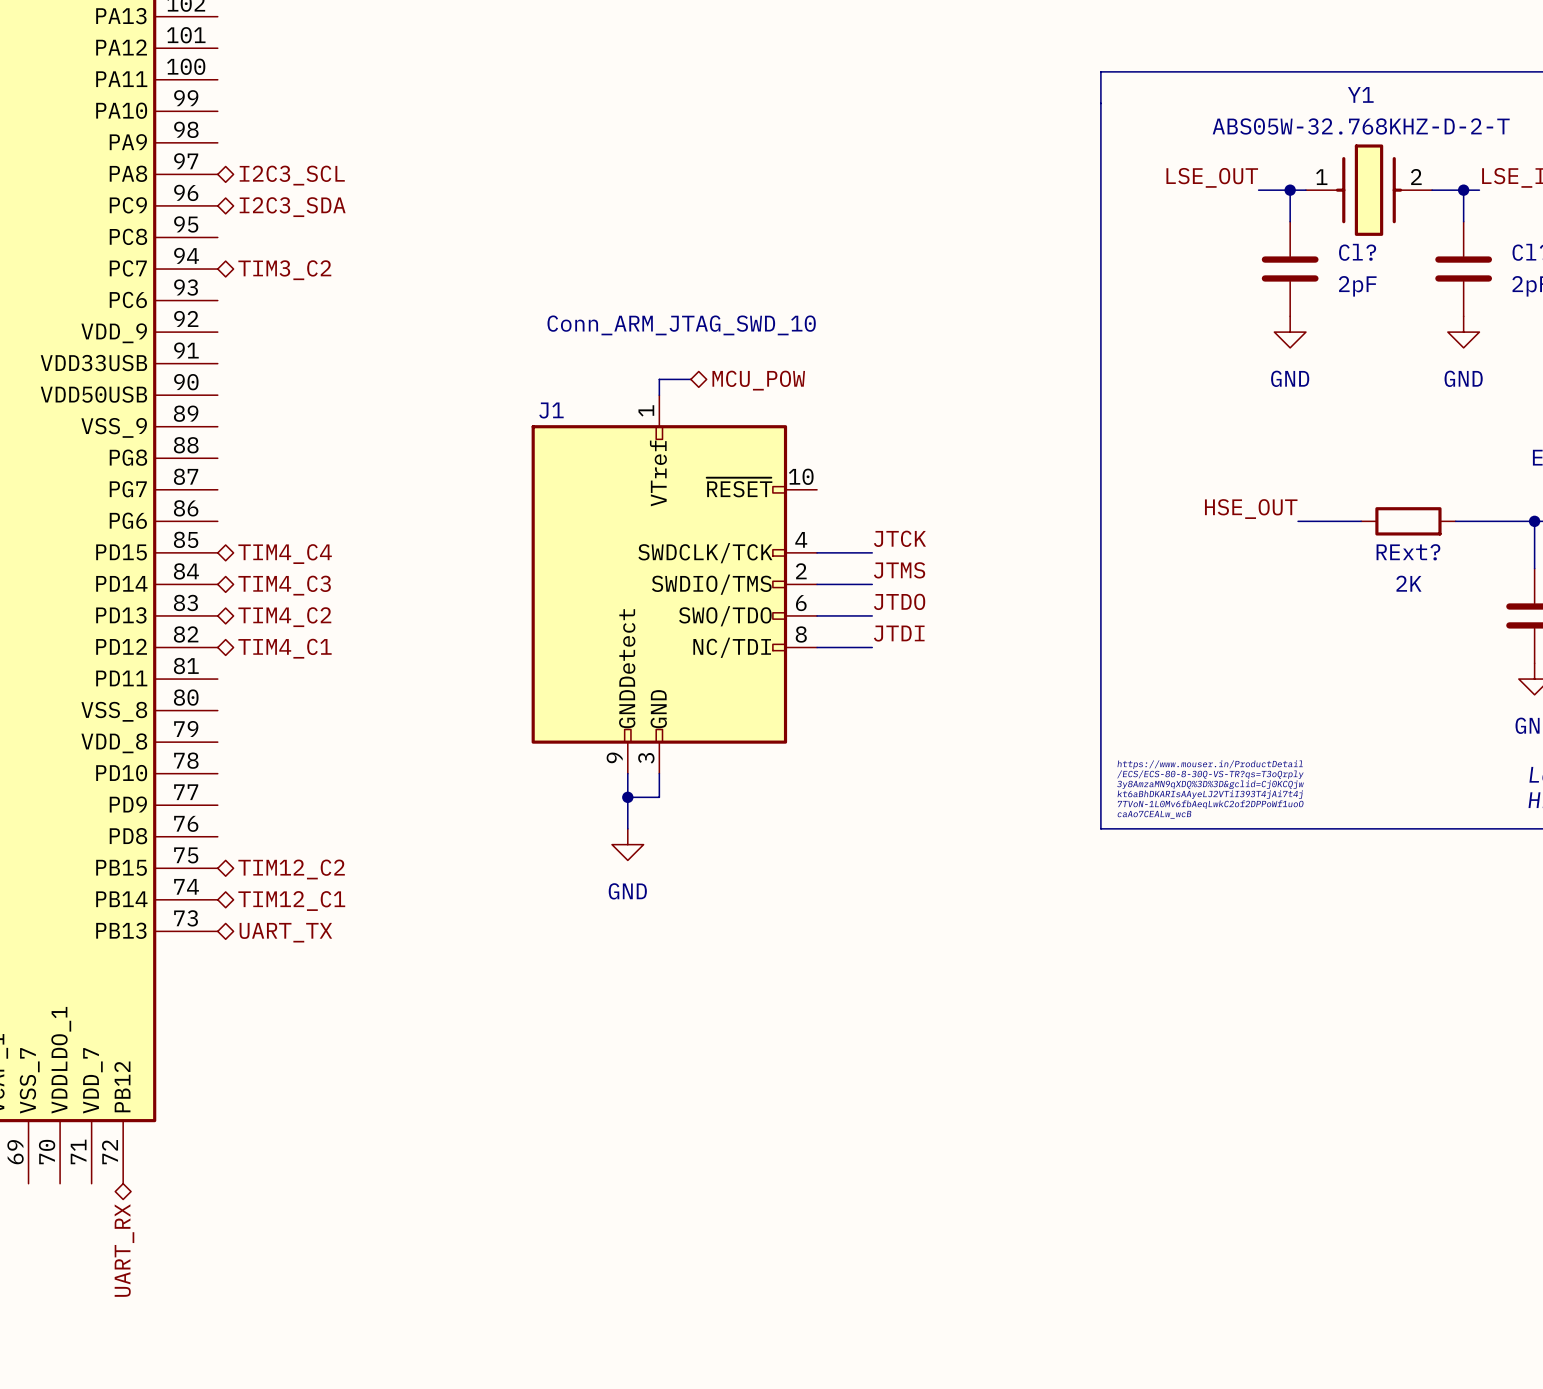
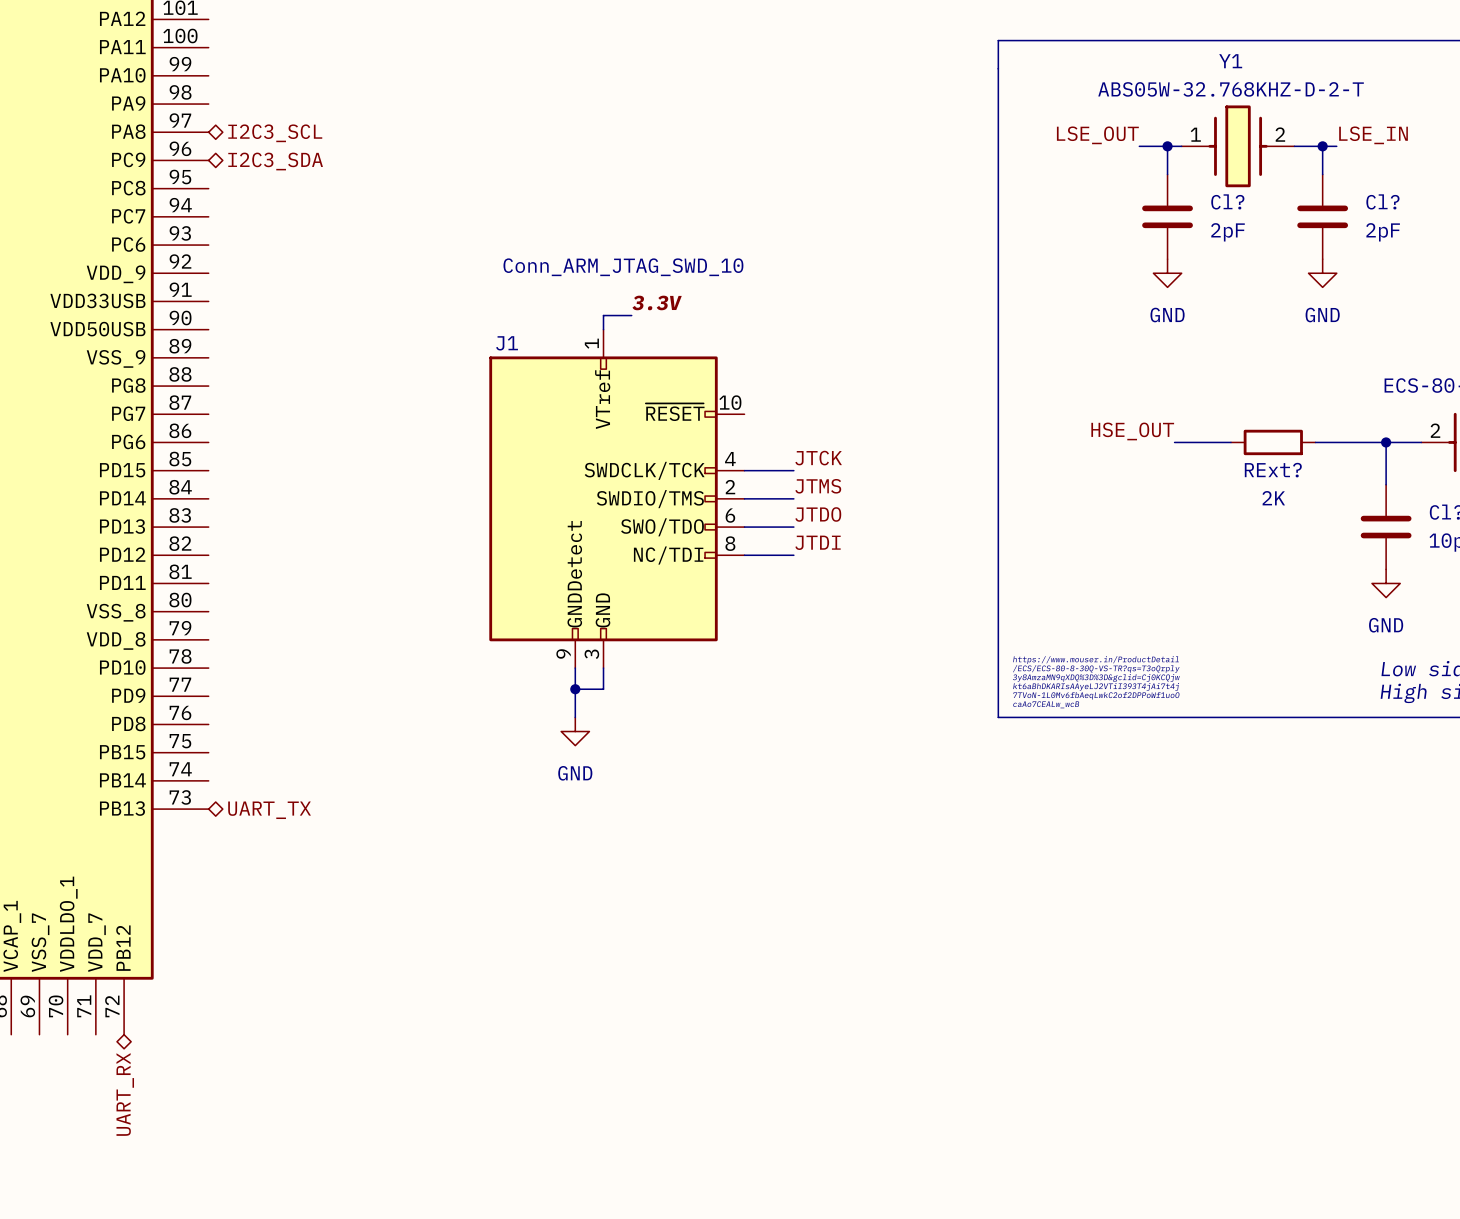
hierarchical label: TIM3_C2 (284, 270) -> none
label: none -> 3.3V (657, 302)
hierarchical label: MCU_POW (758, 380) -> none
hierarchical label: TIM4_C4 (285, 554) -> none
hierarchical label: TIM4_C3 (284, 585) -> none
hierarchical label: TIM4_C2 (284, 617) -> none
hierarchical label: TIM4_C1 (285, 648) -> none
hierarchical label: TIM12_C2 (291, 869) -> none
hierarchical label: TIM12_C1 (291, 901) -> none

